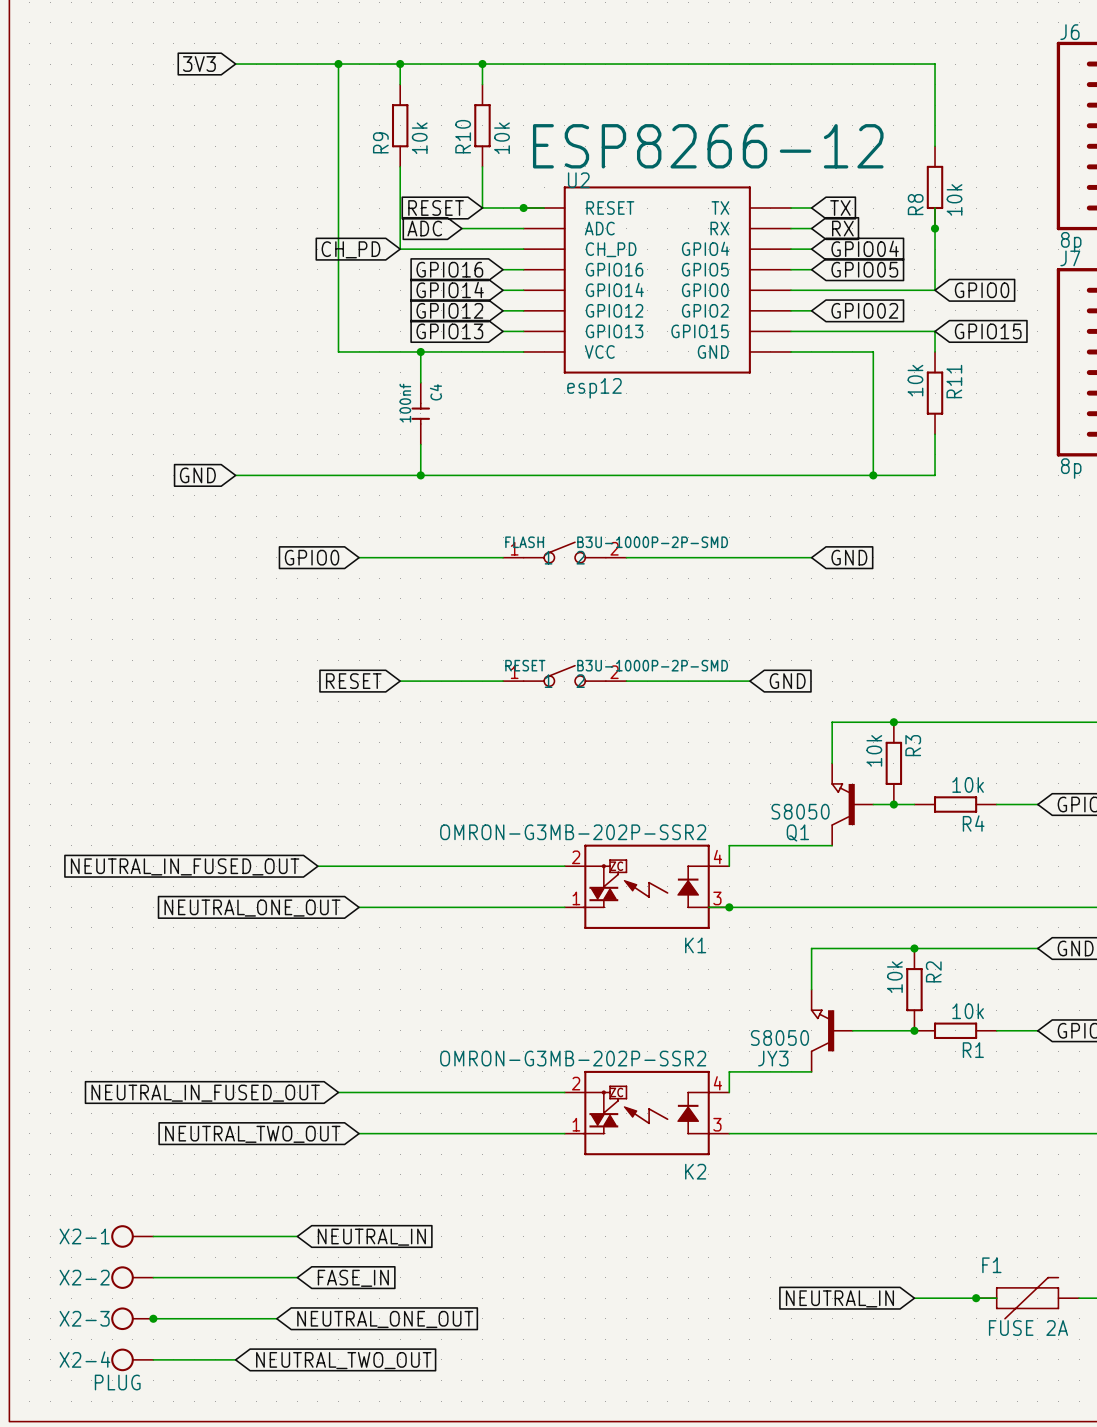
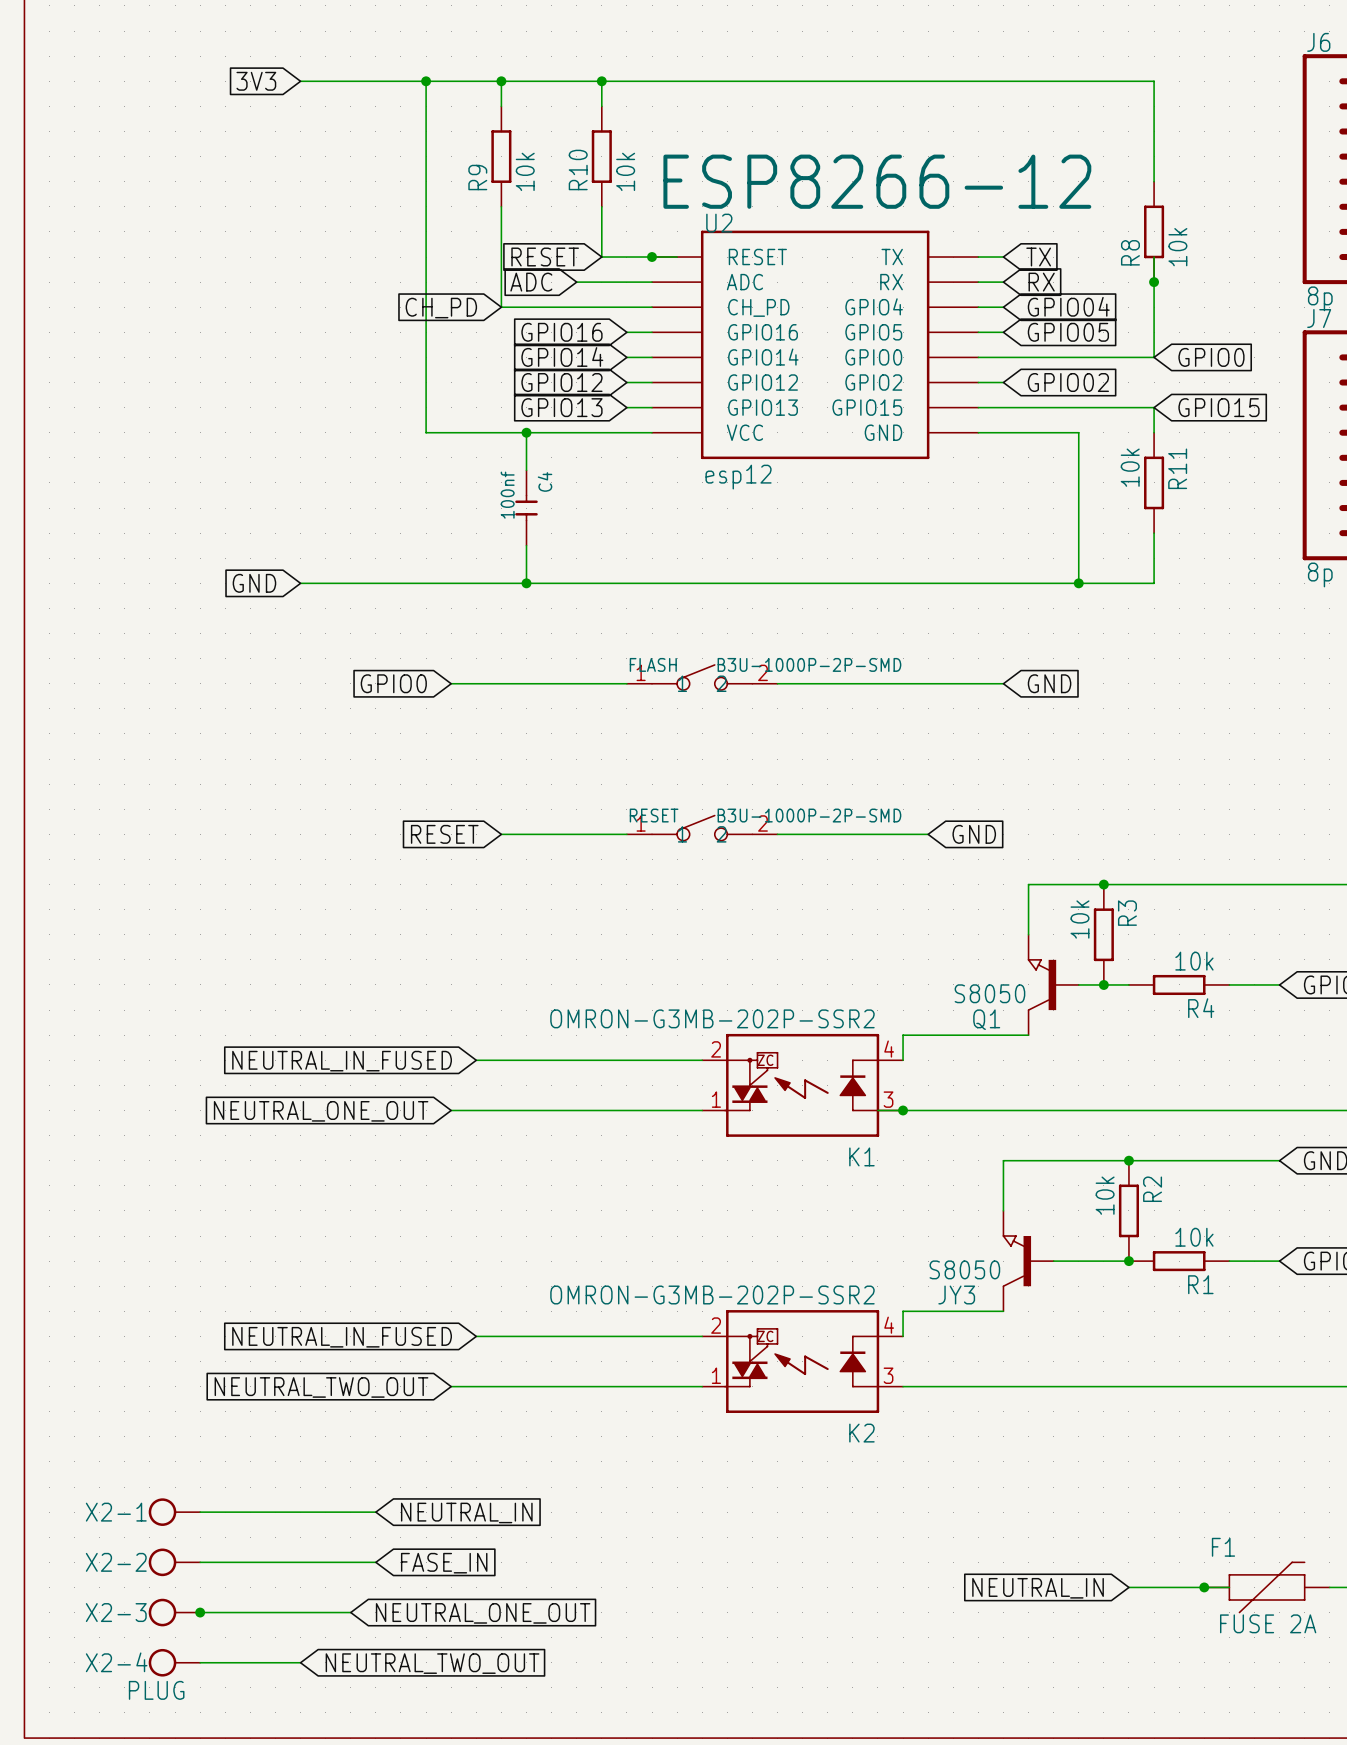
global label: NEUTRAL_IN_FUSED_OUT (185, 866) -> NEUTRAL_IN_FUSED (342, 1061)
wire: (317, 866) (379, 866) -> none
wire: (338, 1092) (379, 1092) -> none
global label: NEUTRAL_IN_FUSED_OUT (205, 1093) -> NEUTRAL_IN_FUSED (342, 1337)

